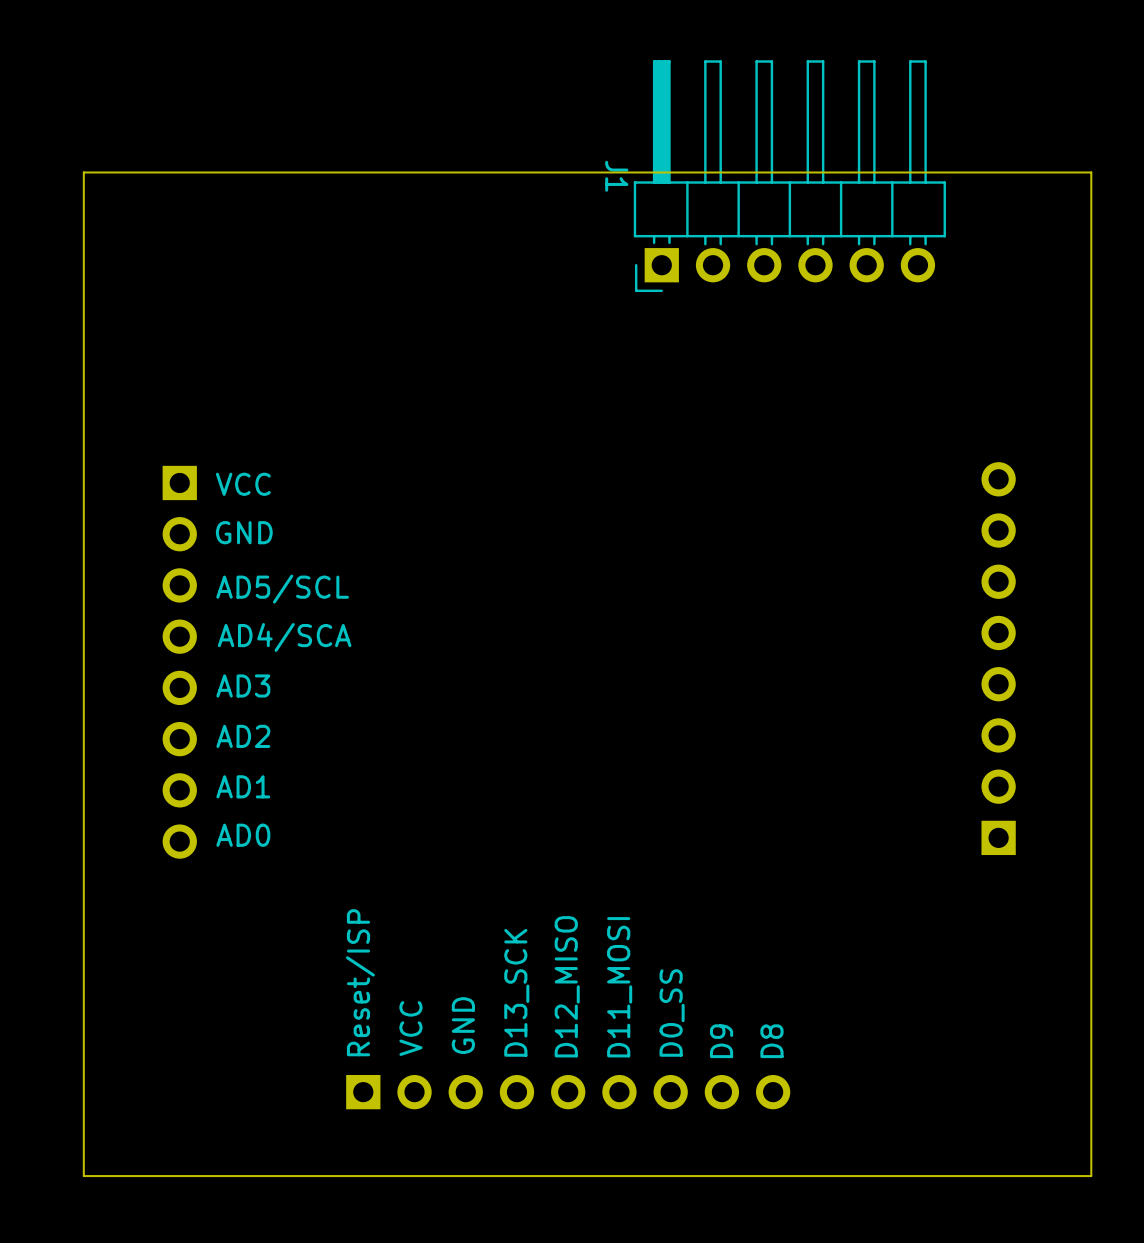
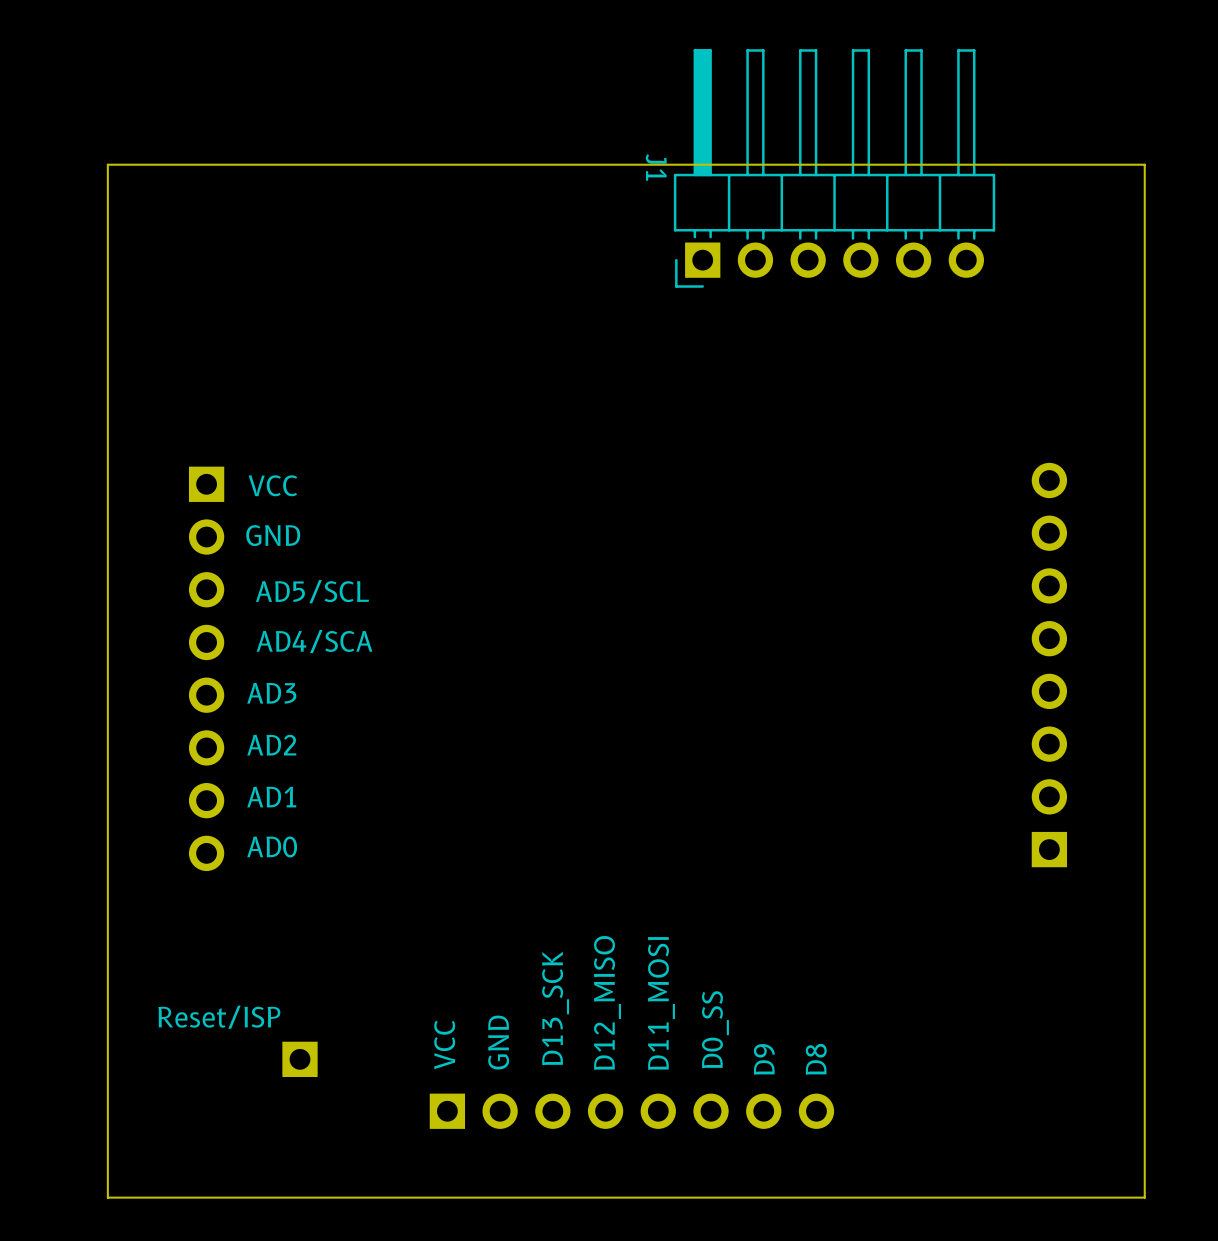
text rotation: 0° (360, 982) -> 90° clockwise (219, 1017)
part: none -> (300, 1059)
part: (568, 1092) -> none
part: none -> (631, 1111)

